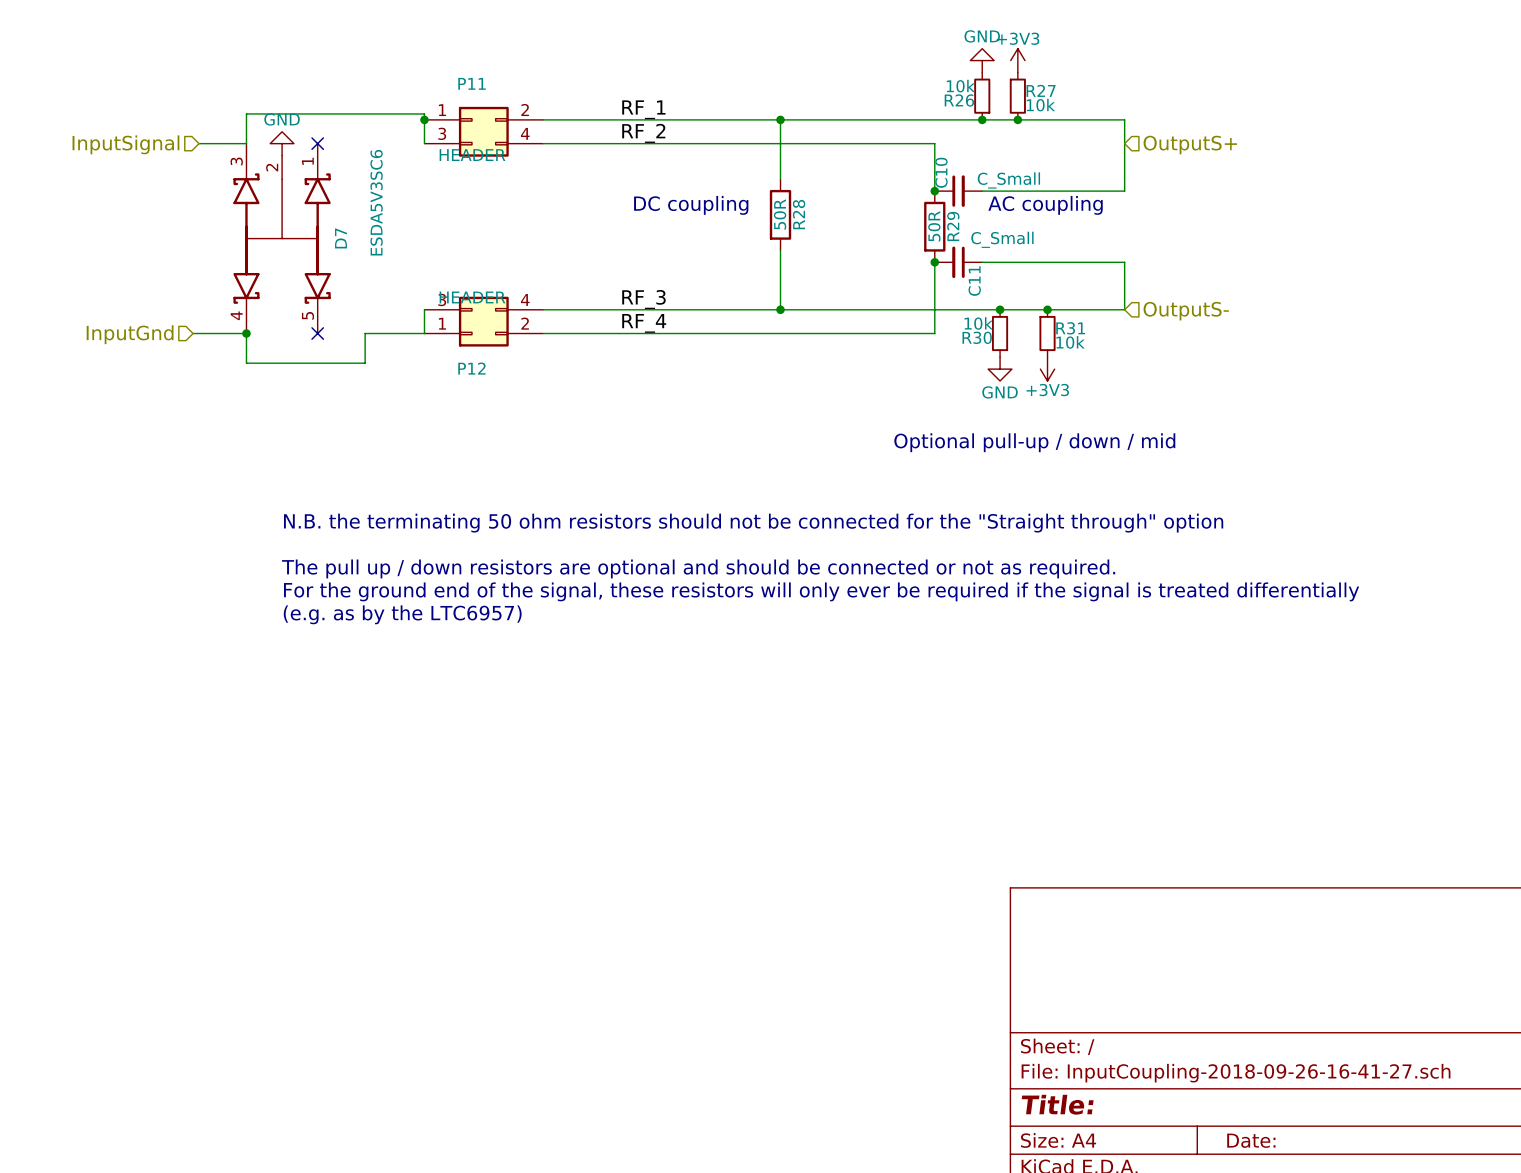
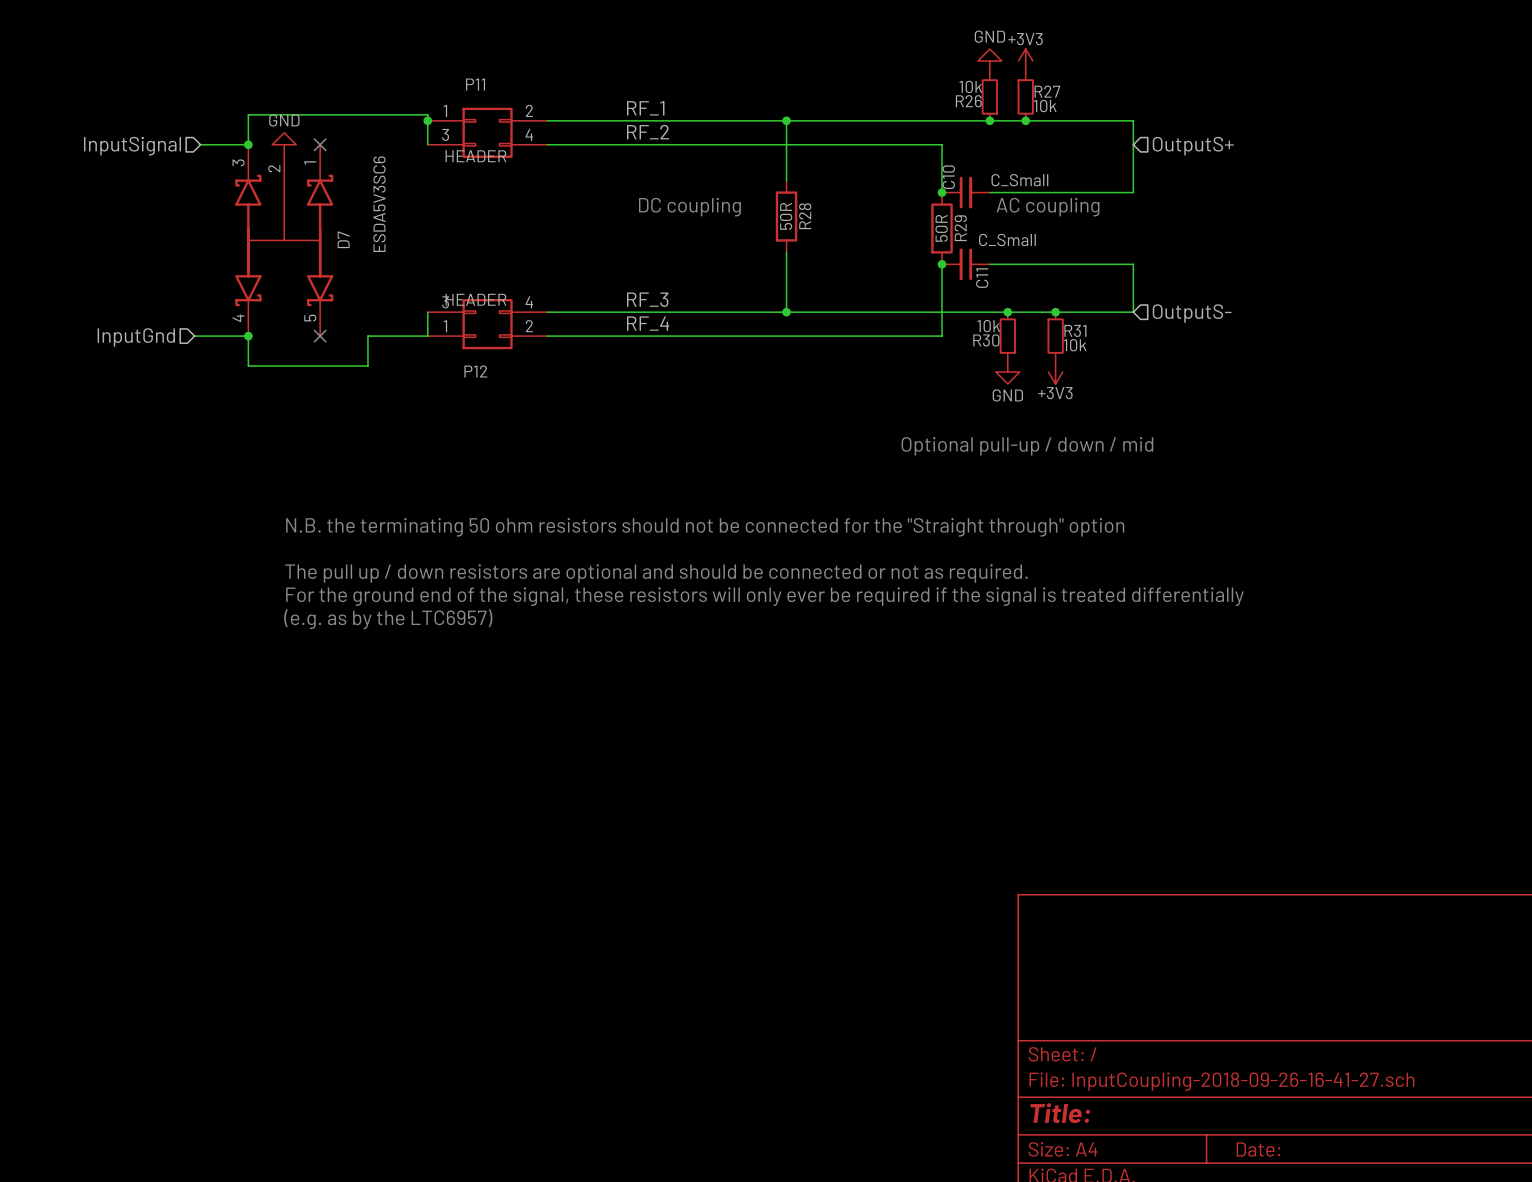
junction: none -> (248, 144)

